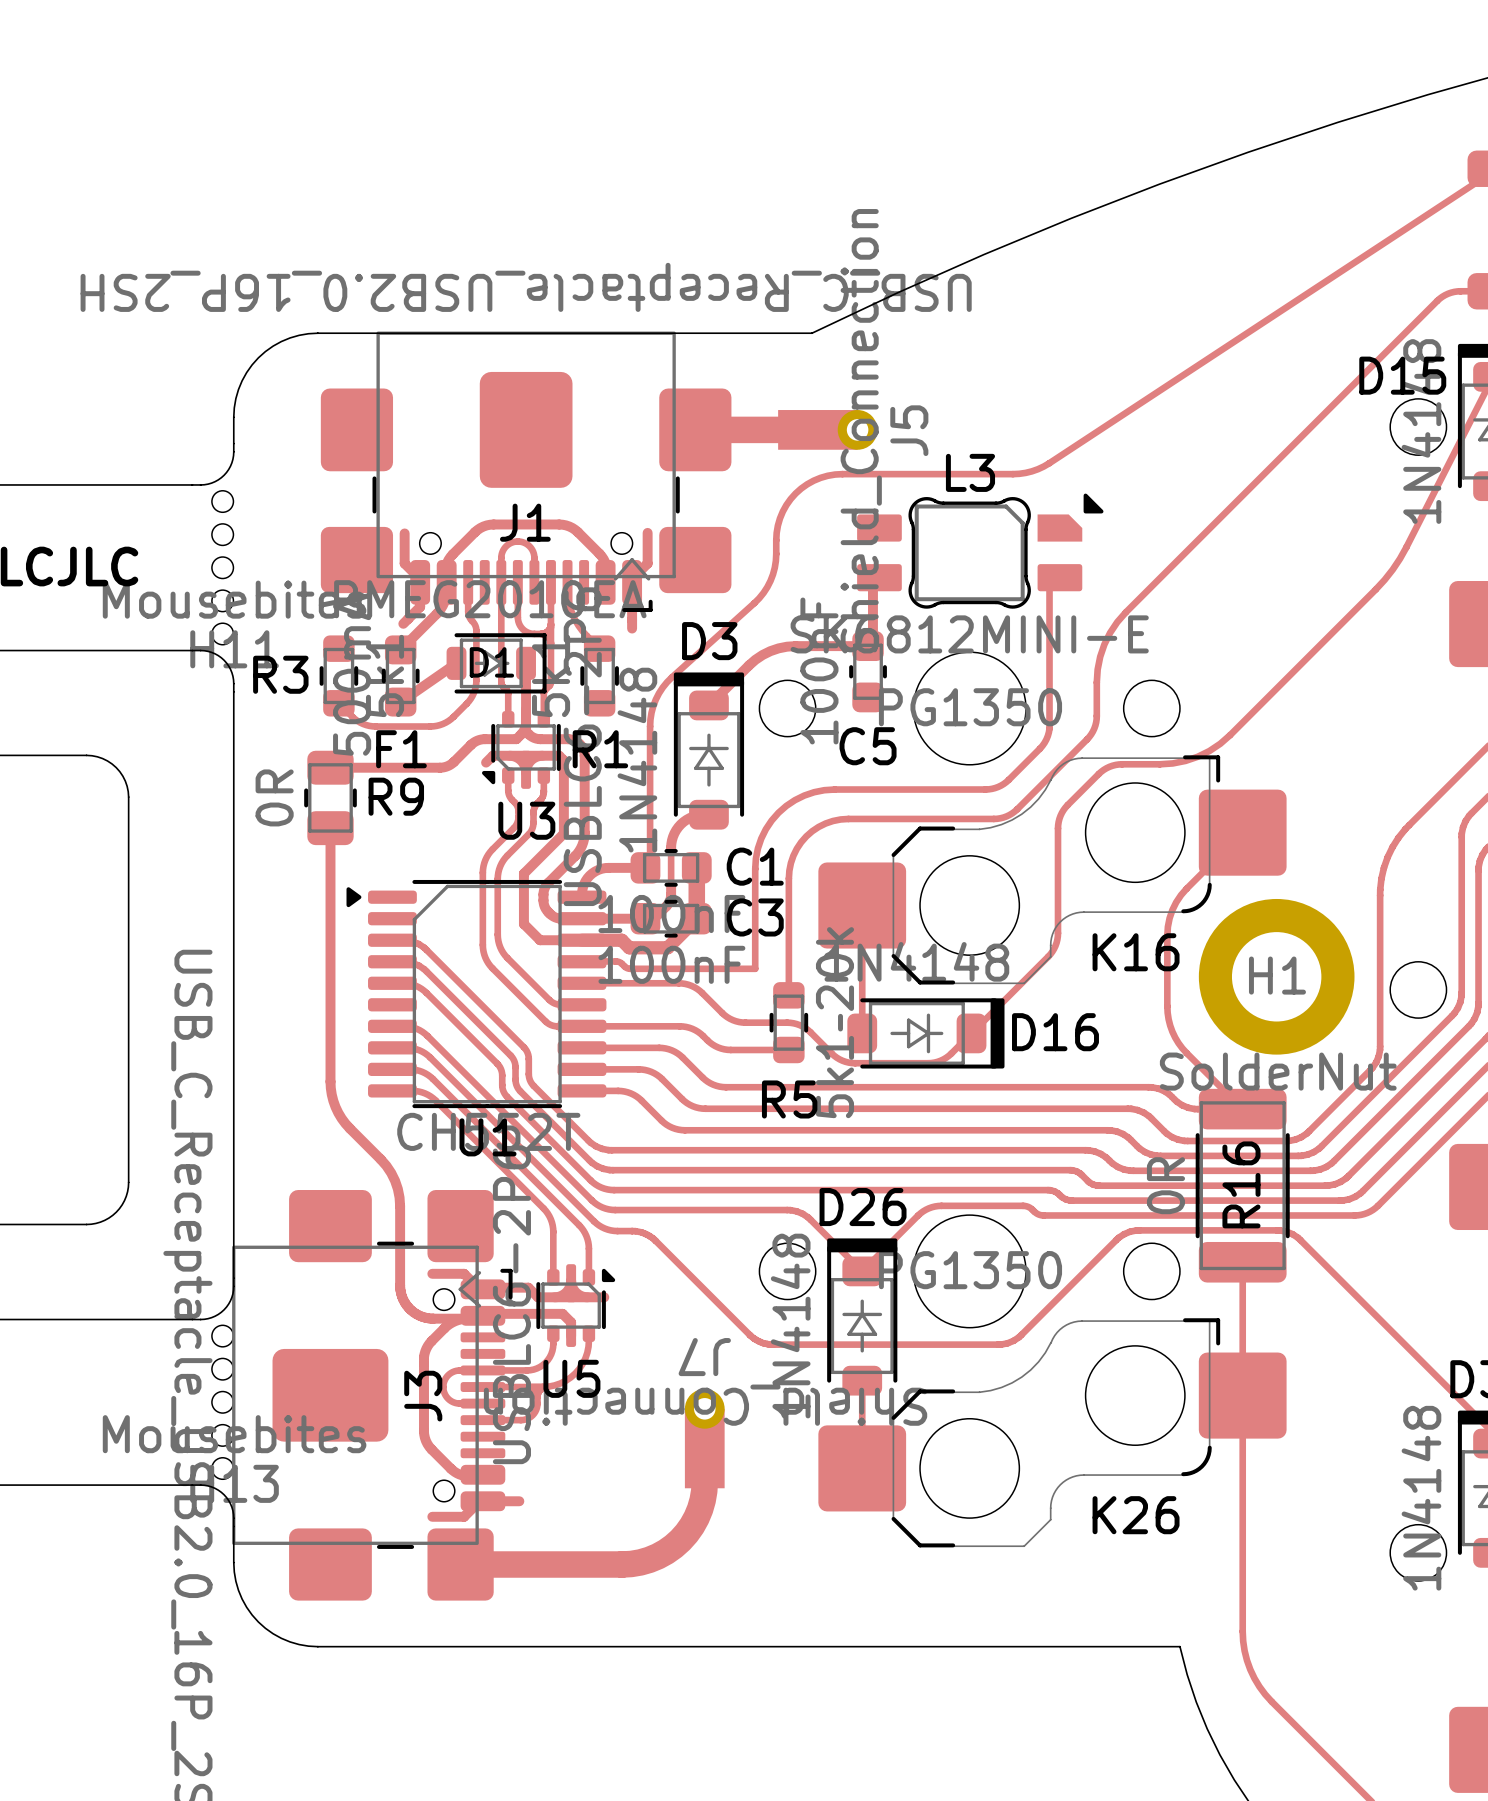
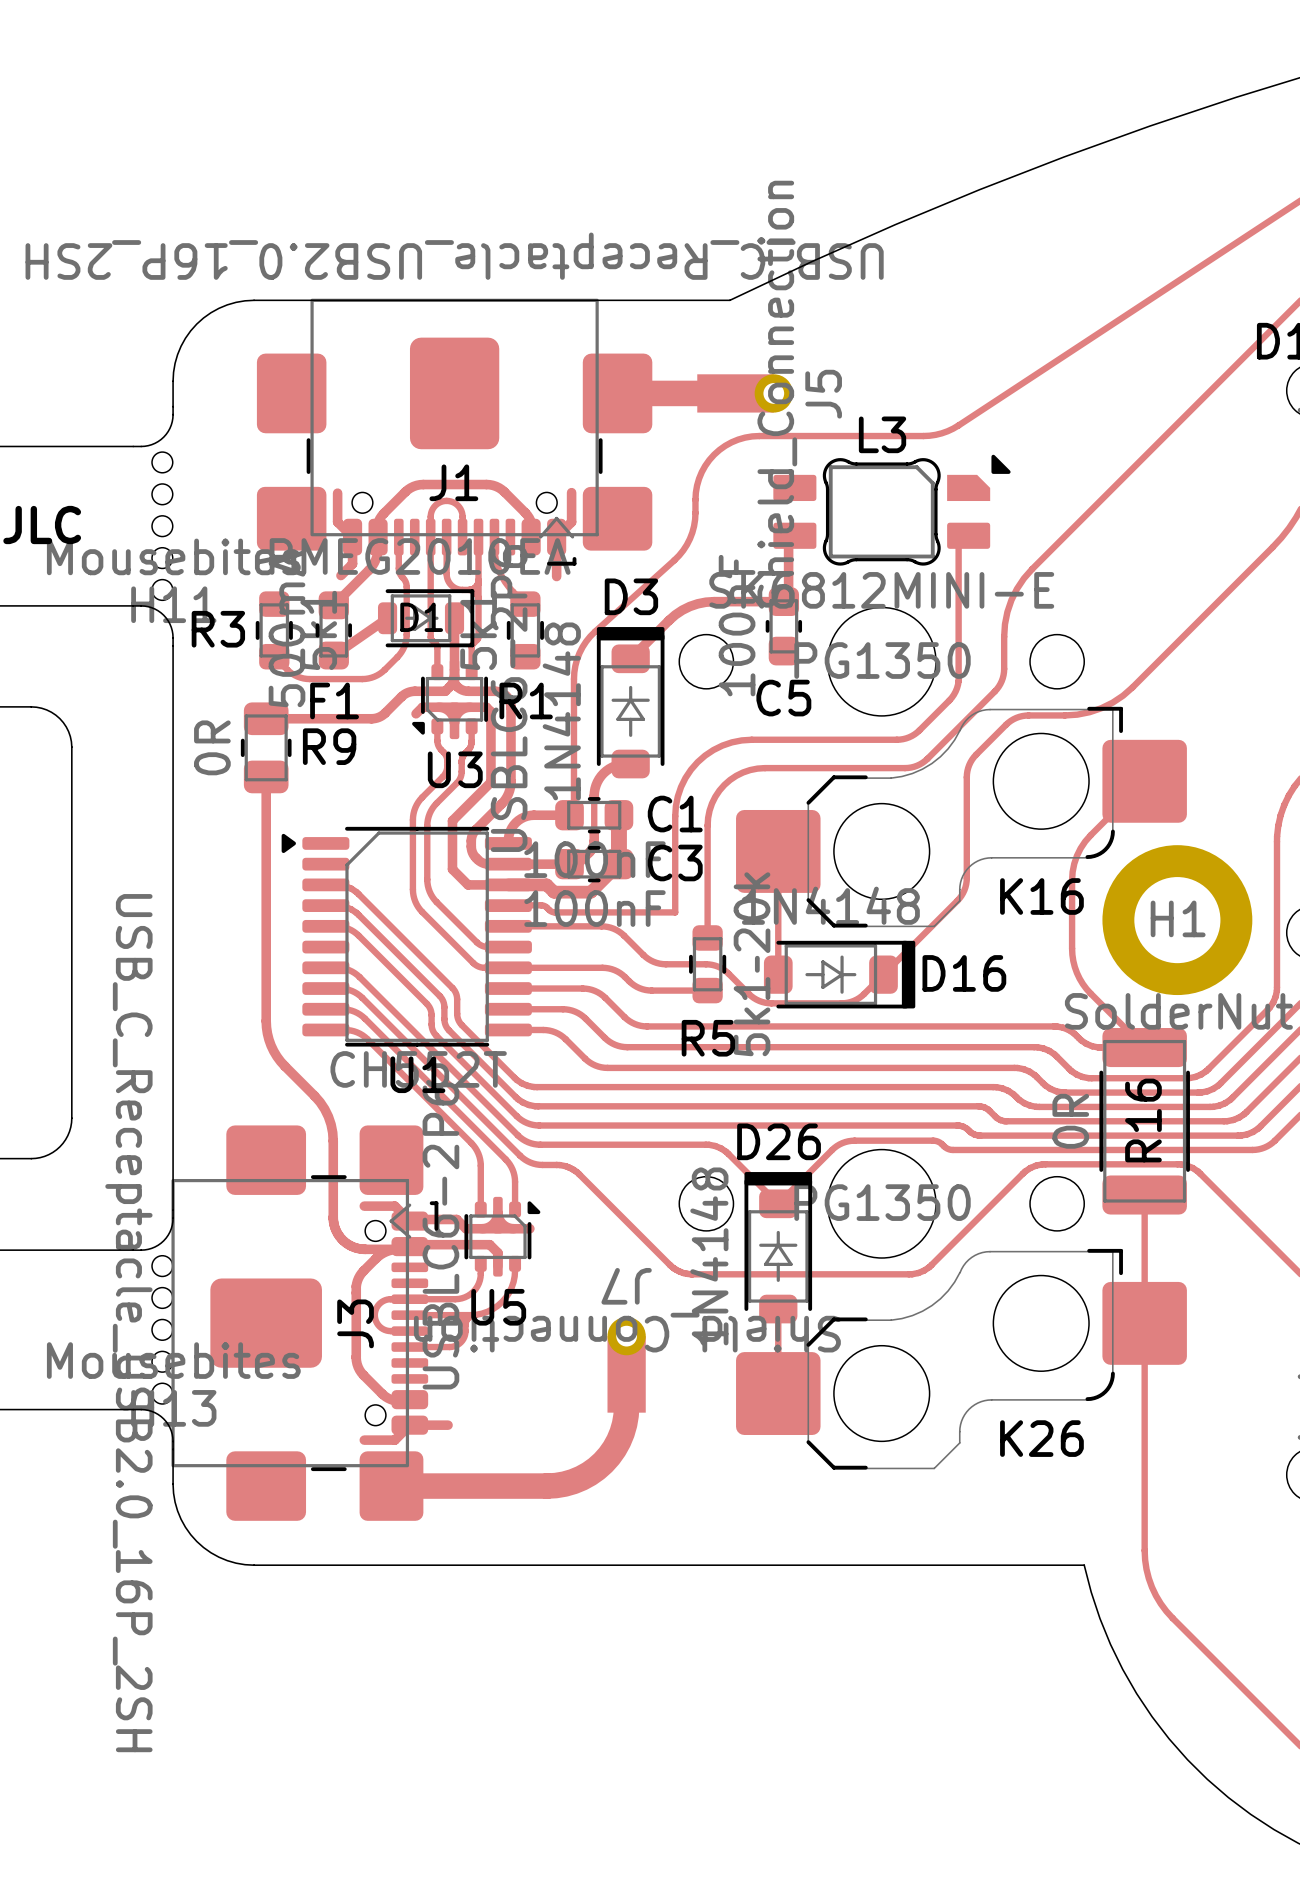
J1 footprint: [320, 331, 732, 613] -> [256, 298, 653, 566]
track: (408, 619) (403, 623) -> none
track: (632, 620) (632, 628) -> none
J3 footprint: [232, 1190, 513, 1601] -> [171, 1125, 439, 1521]

